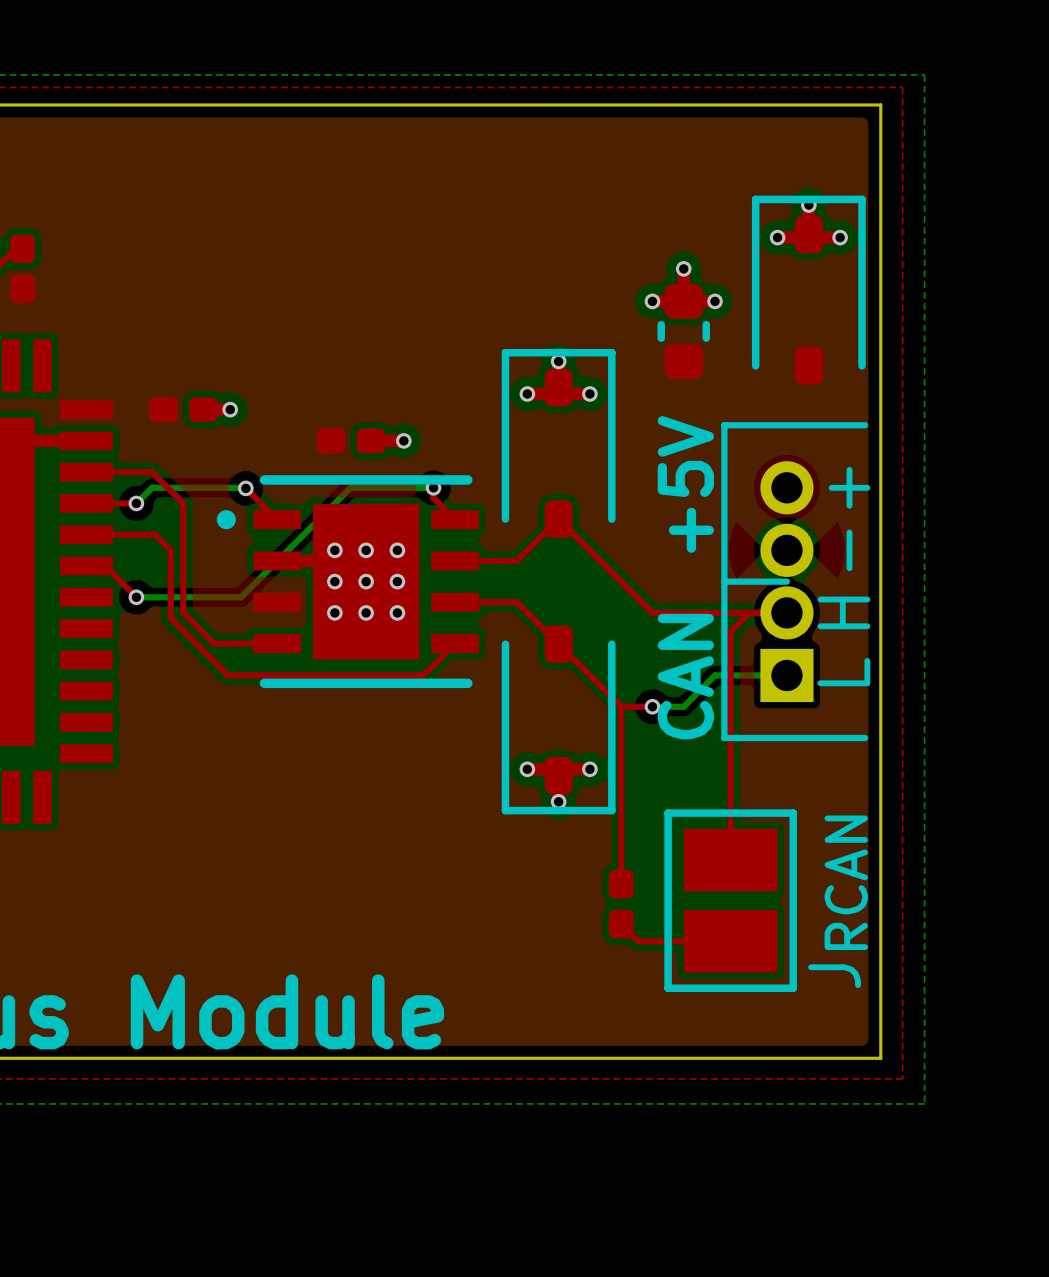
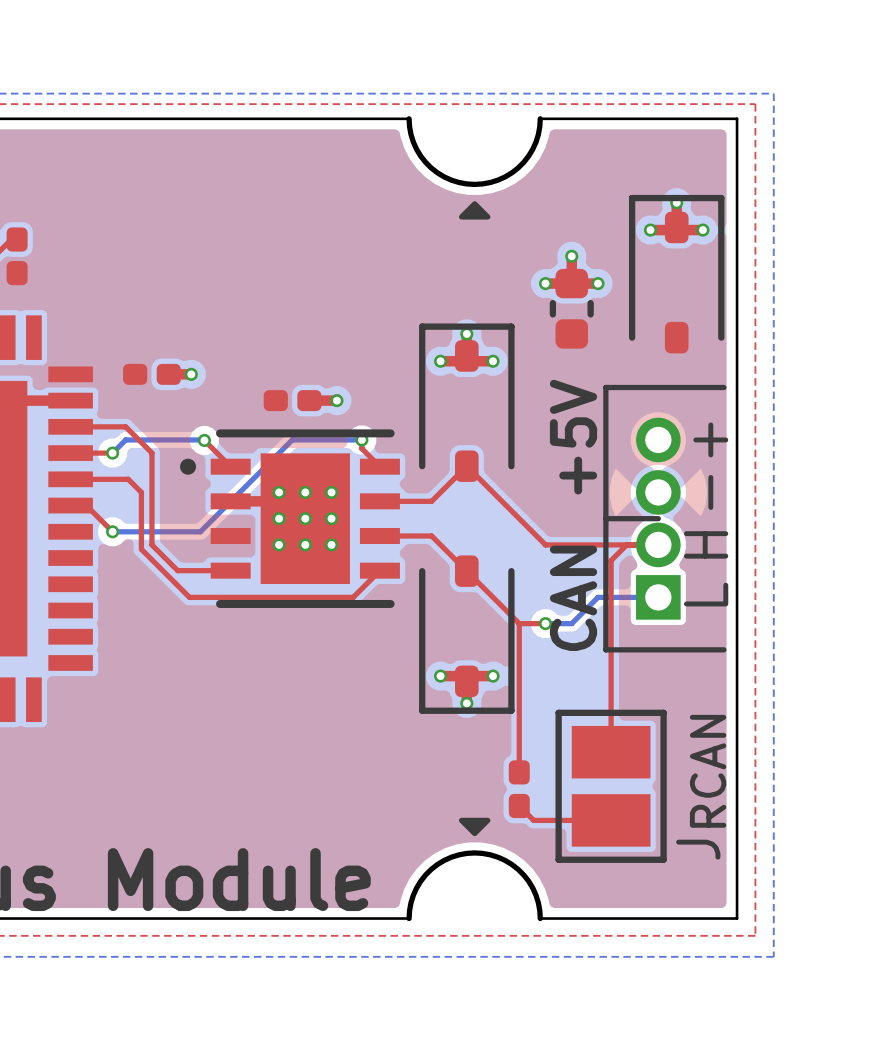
board edge: (489, 104) (646, 104) -> (409, 118) (413, 142) (425, 162) (437, 172) (451, 180) (474, 184) (497, 180) (518, 167) (528, 156) (536, 142) (540, 118)
drawing: none -> [458, 201, 491, 220]
drawing: none -> [458, 817, 491, 837]
board edge: (489, 1058) (646, 1058) -> (409, 918) (413, 895) (420, 881) (431, 869) (451, 857) (474, 852) (497, 857) (518, 869) (528, 881) (536, 895) (540, 918)

